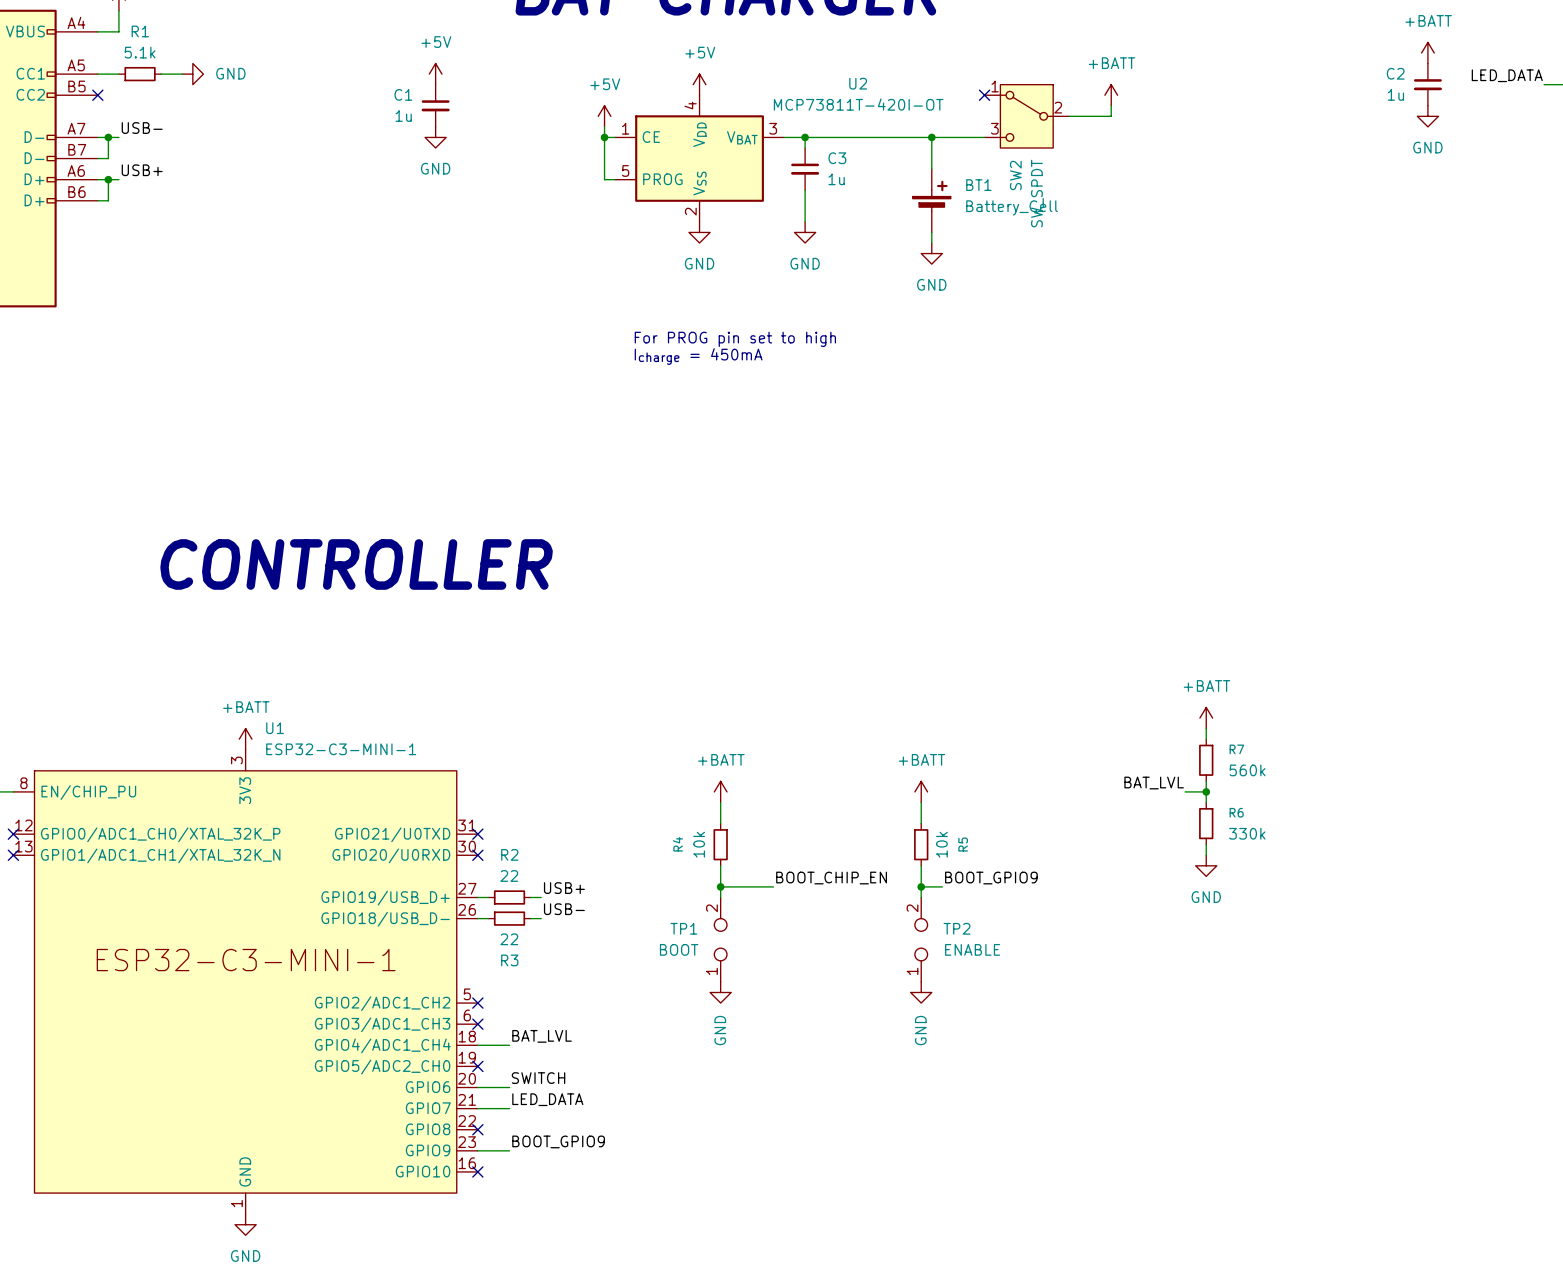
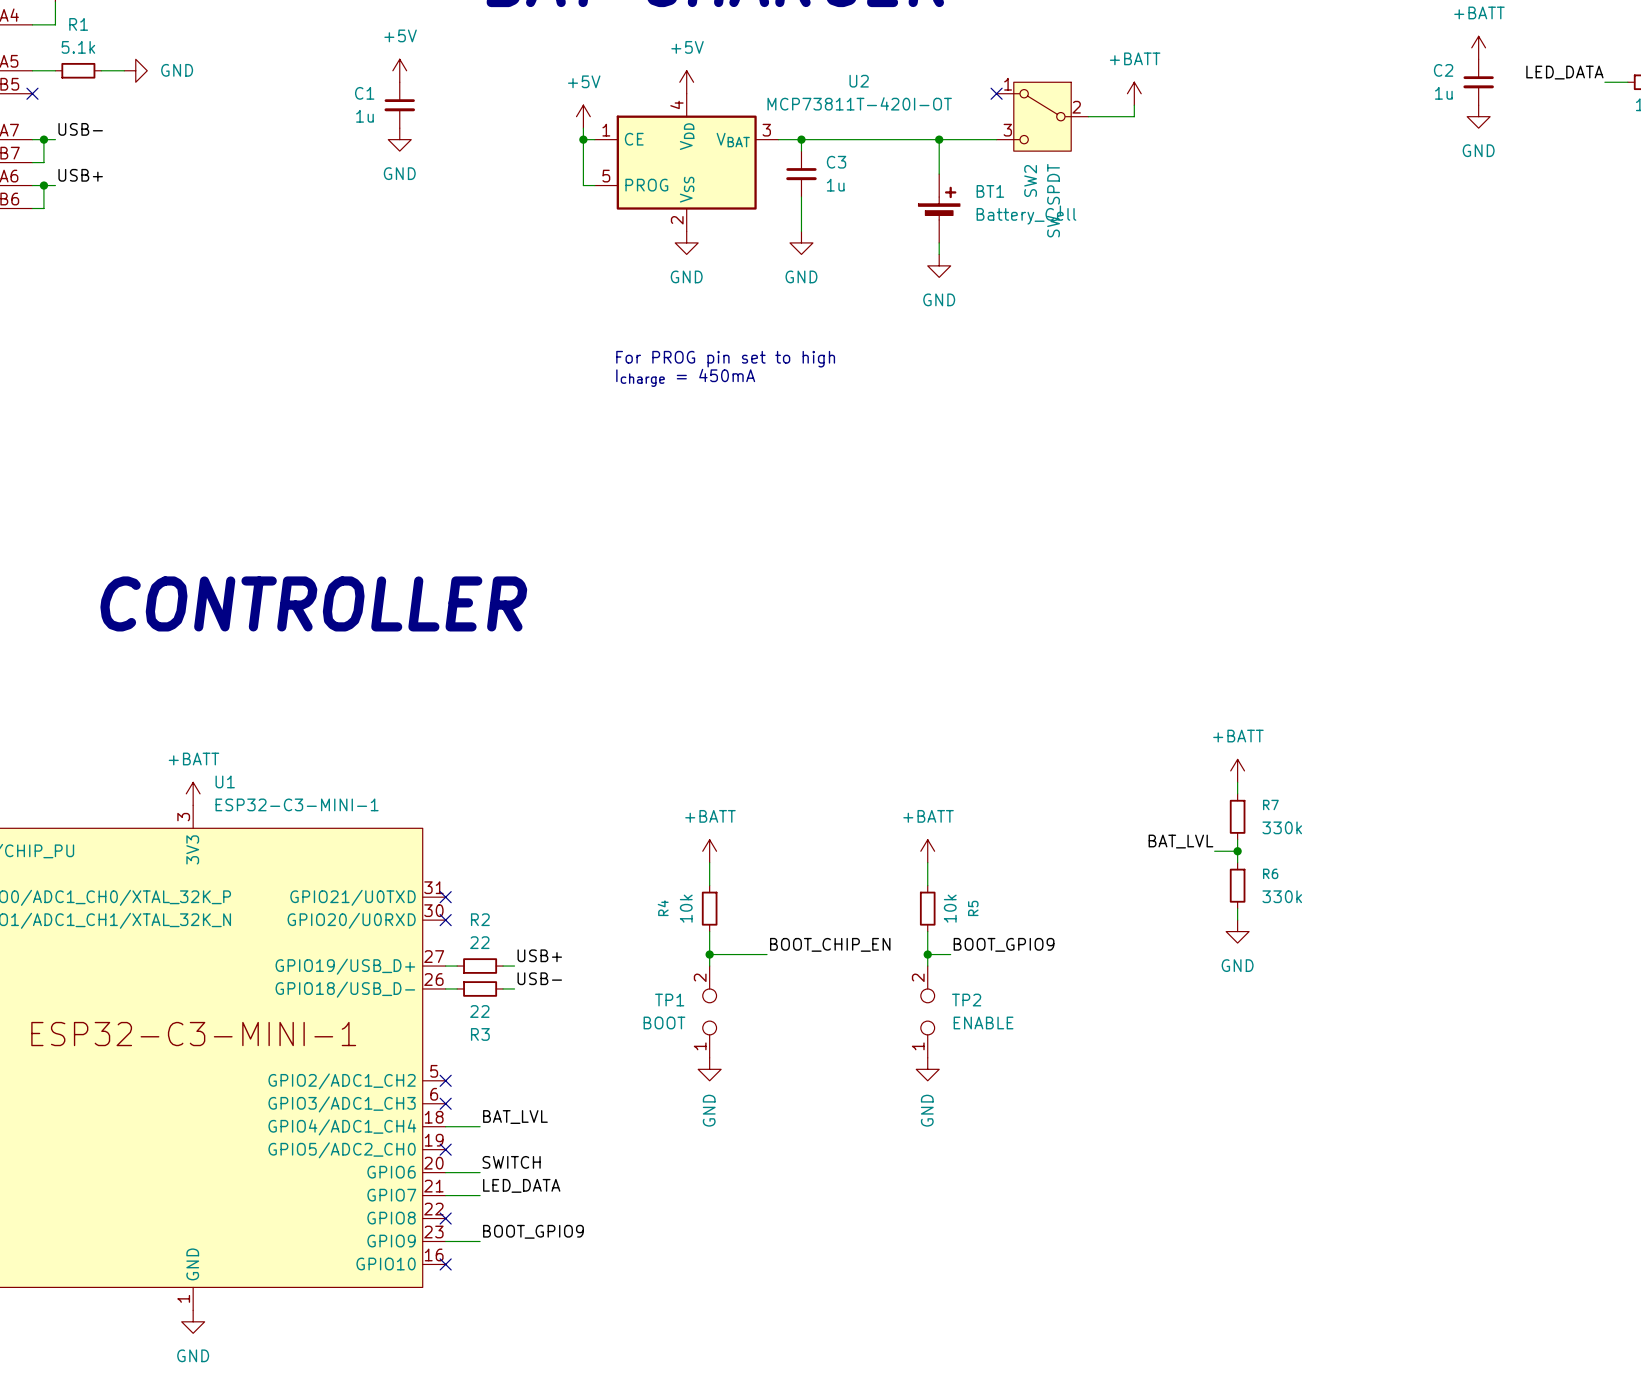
R7 value: 560k (1247, 770) -> 330k (1282, 827)

